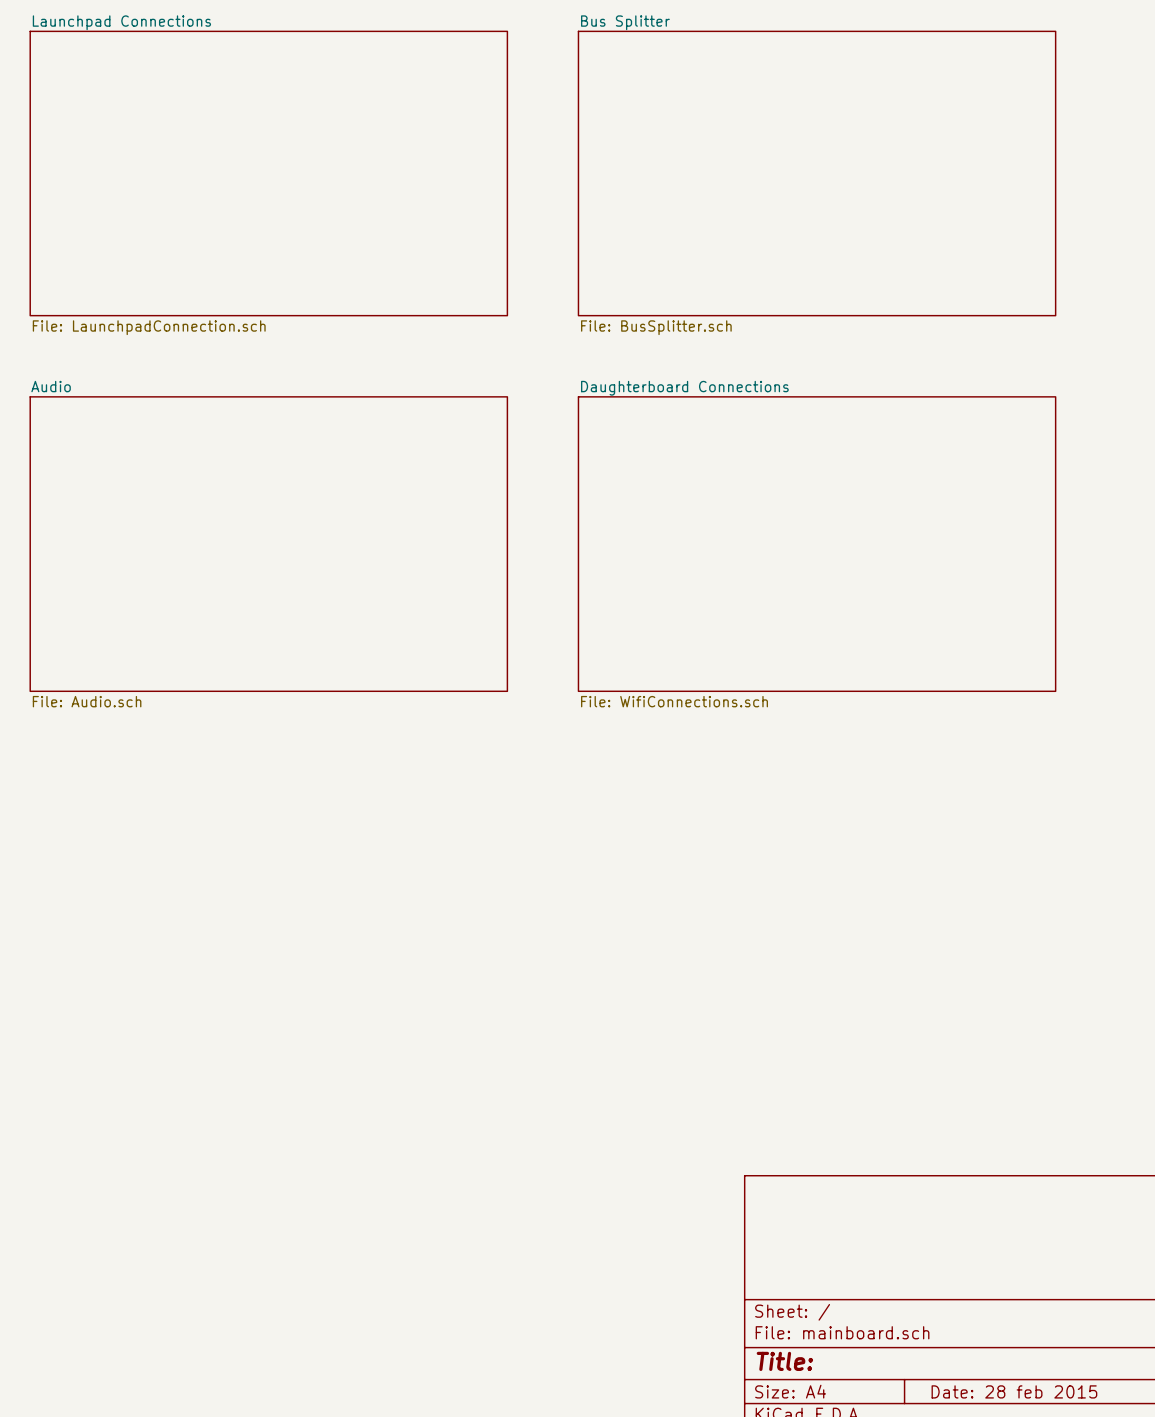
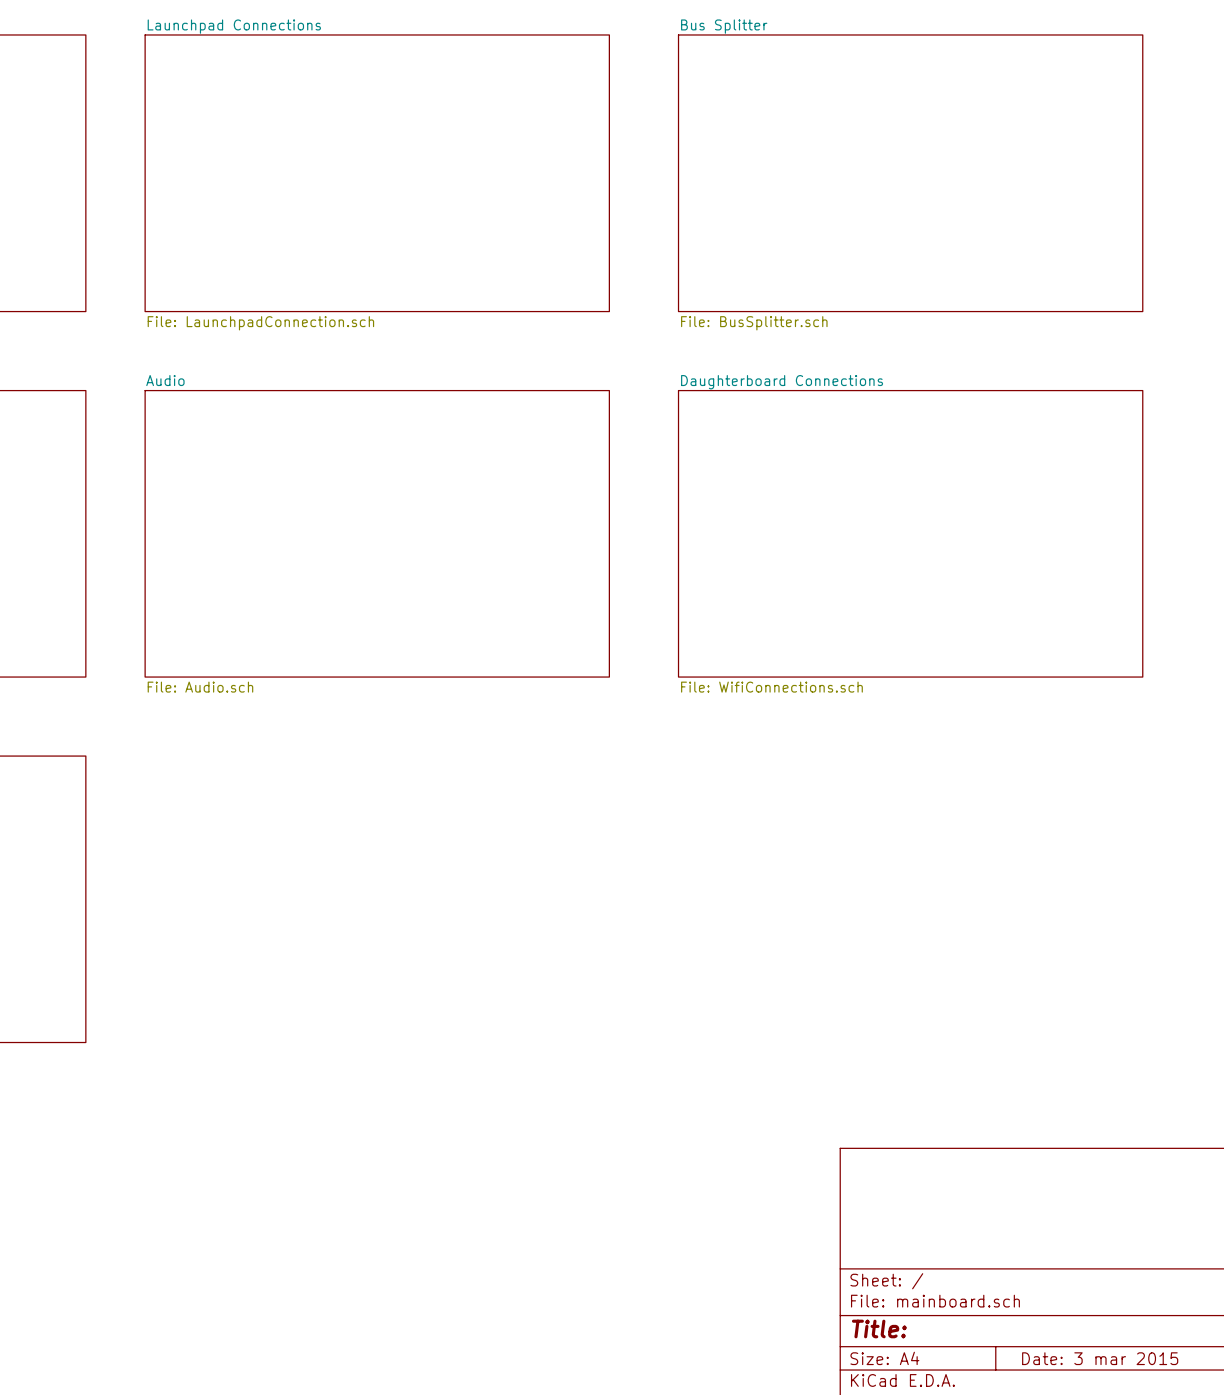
title block: Date: 28 feb 2015 (1014, 1391) -> Date: 3 mar 2015 (1100, 1358)

